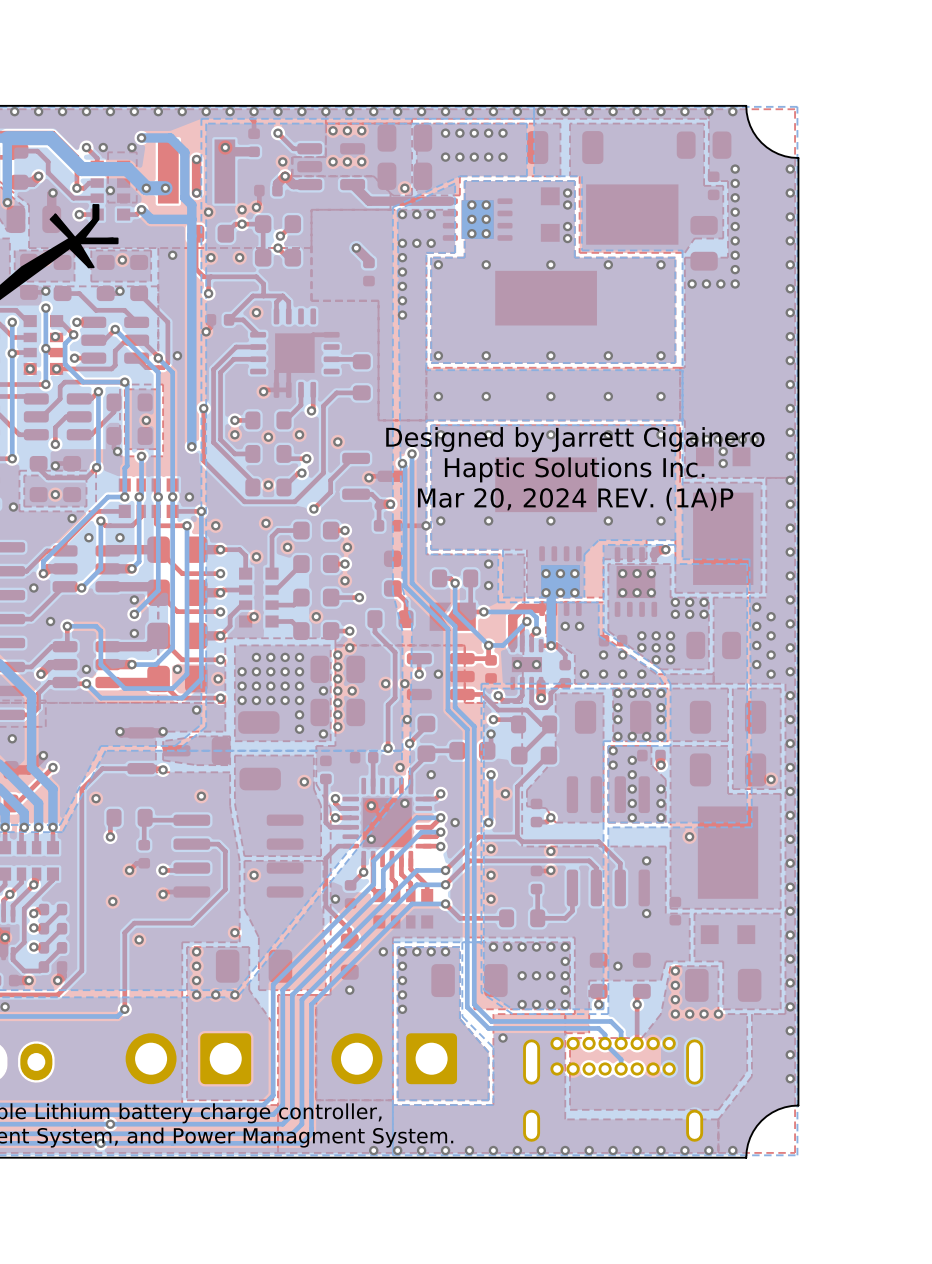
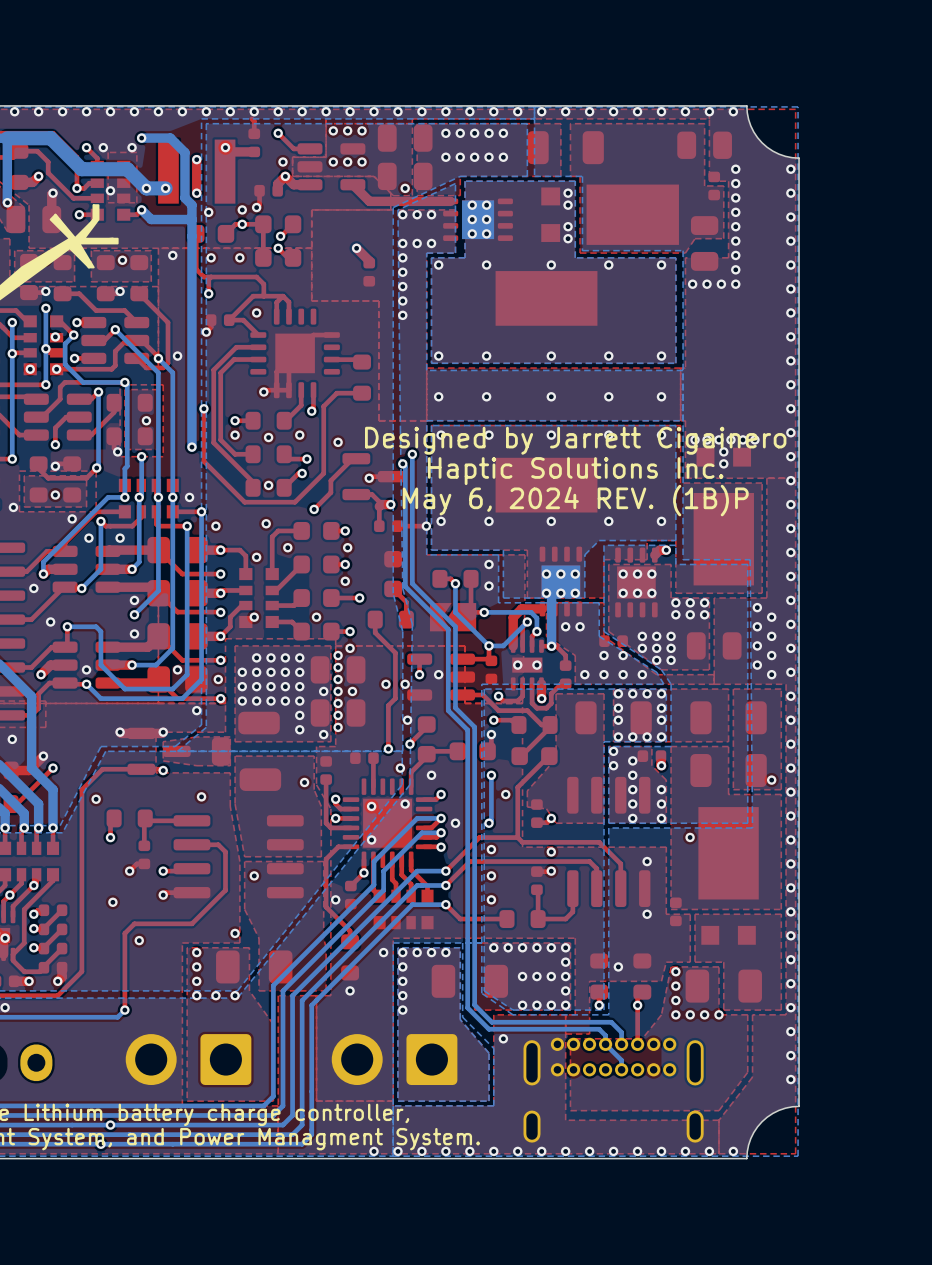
text: Mar 20, 2024 REV. (1A)P (575, 499) -> May 6, 2024 REV. (1B)P (575, 500)

